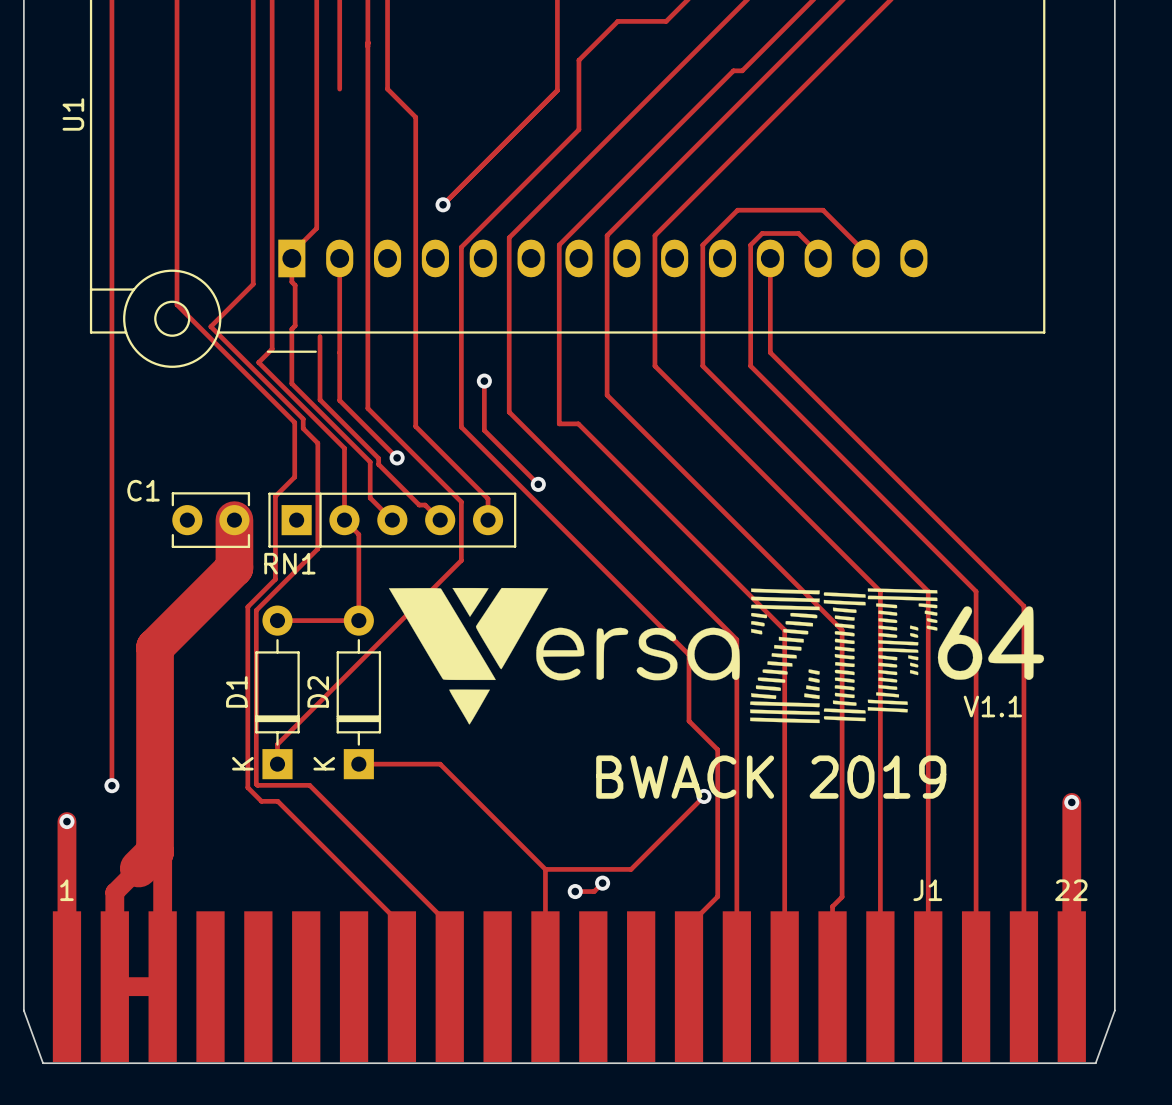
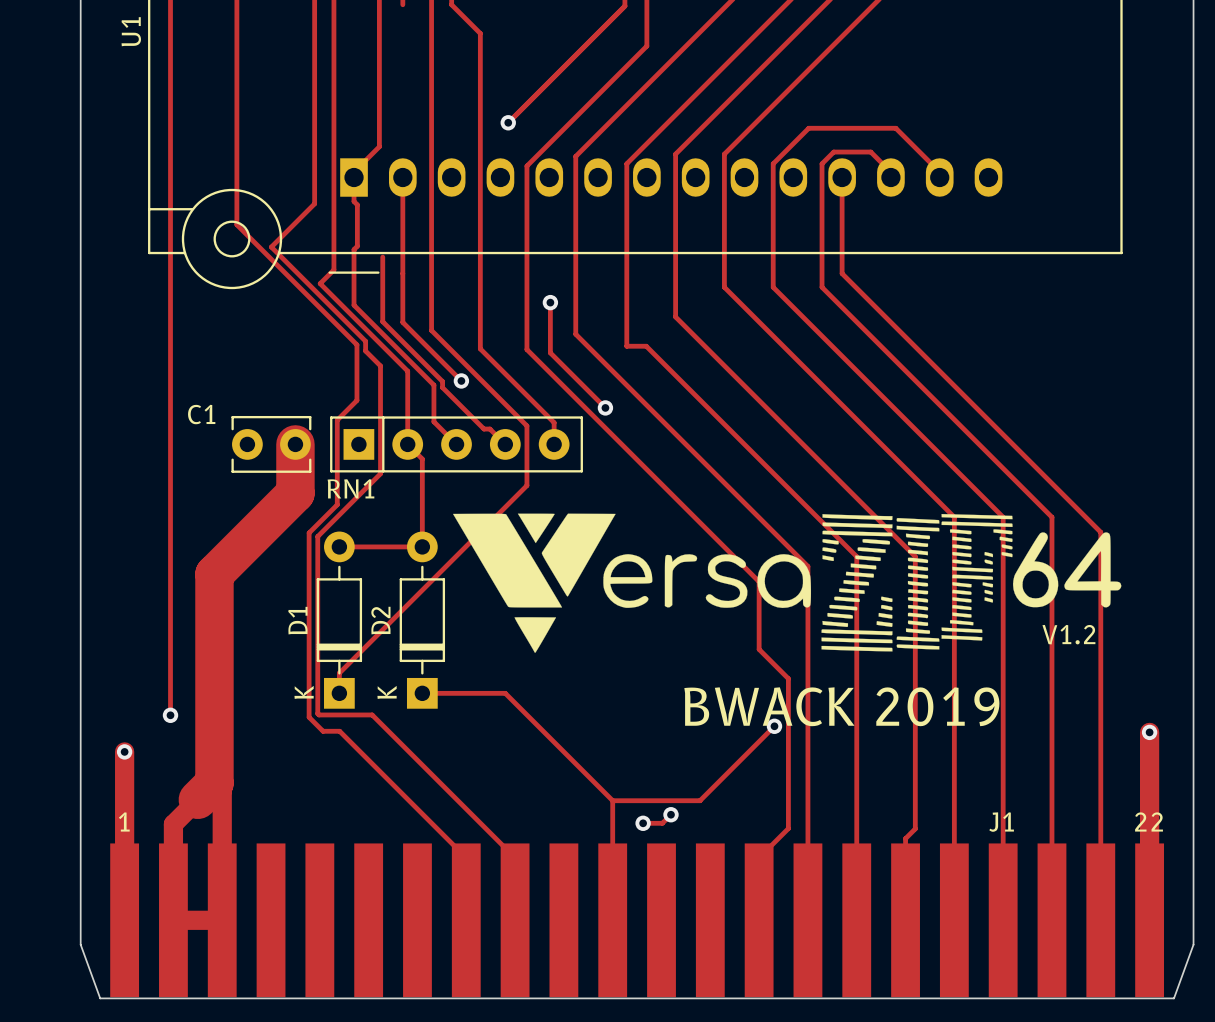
text: V1.1 (992, 706) -> V1.2 (1068, 634)

